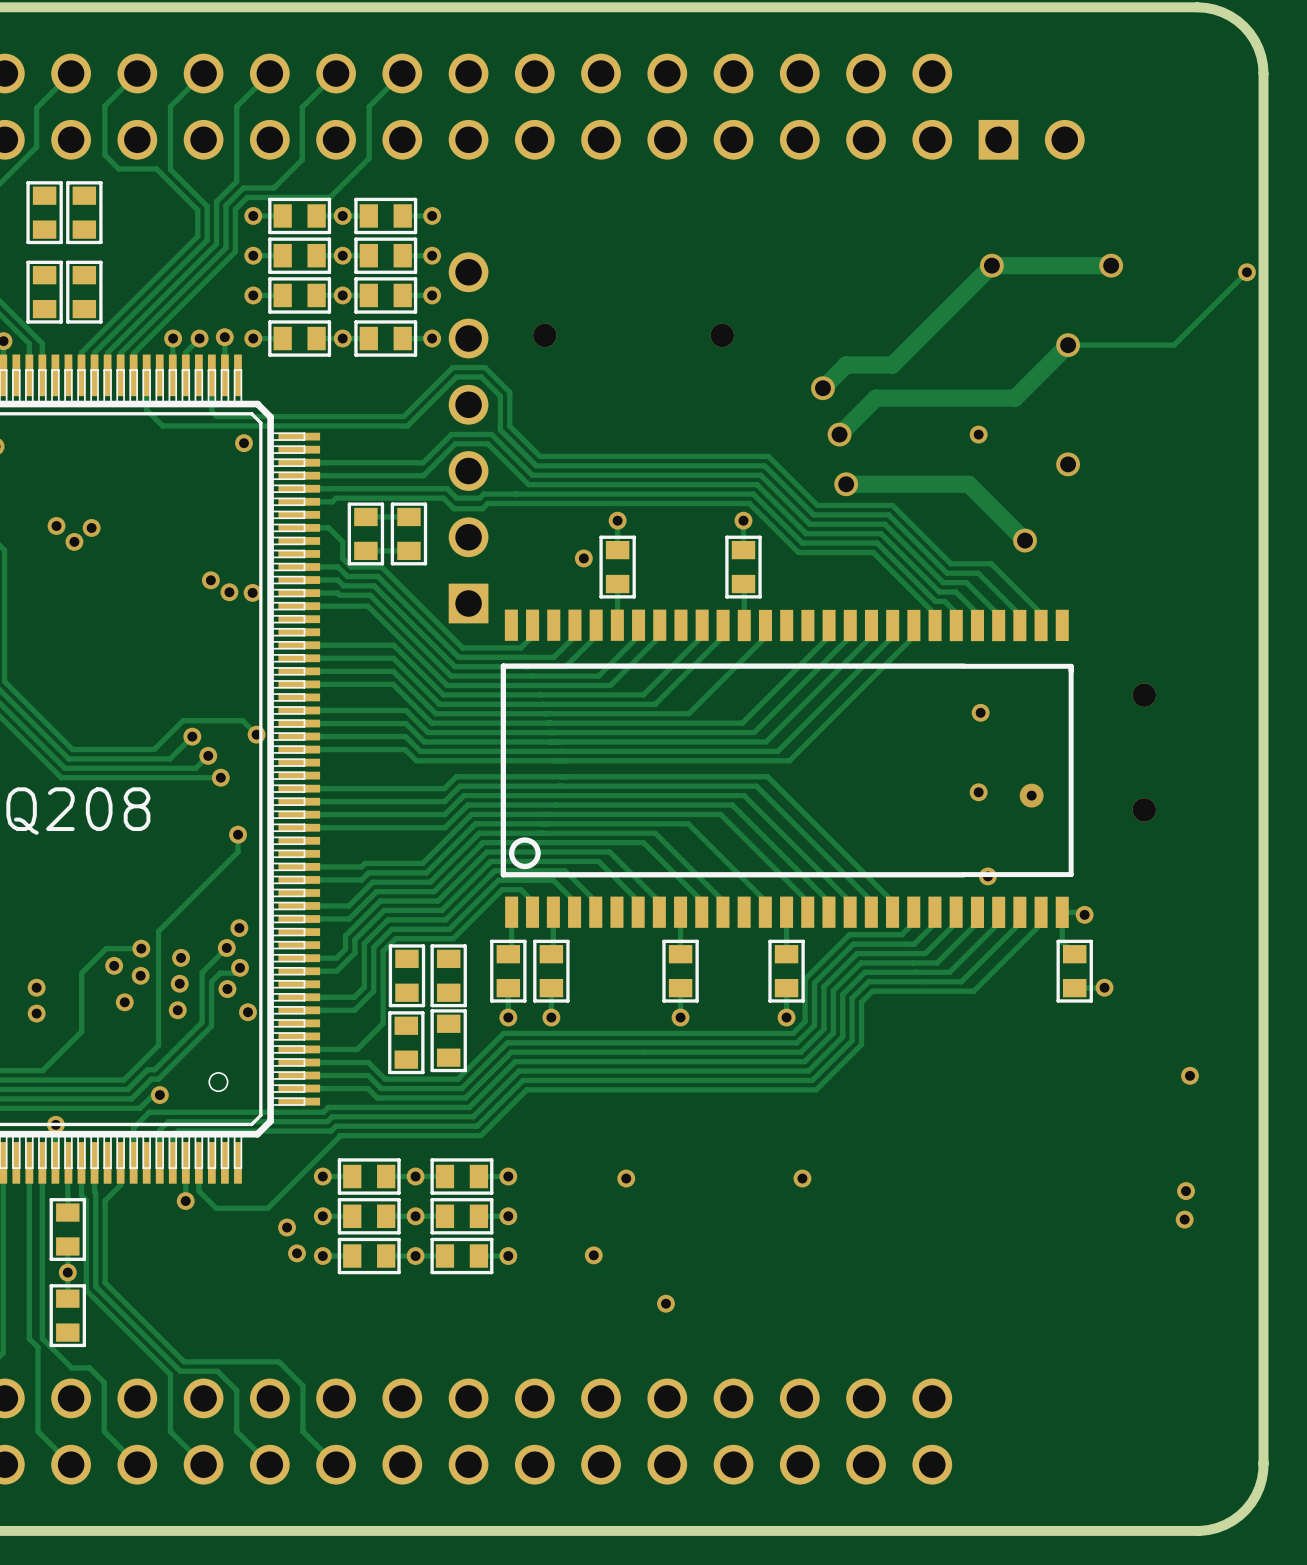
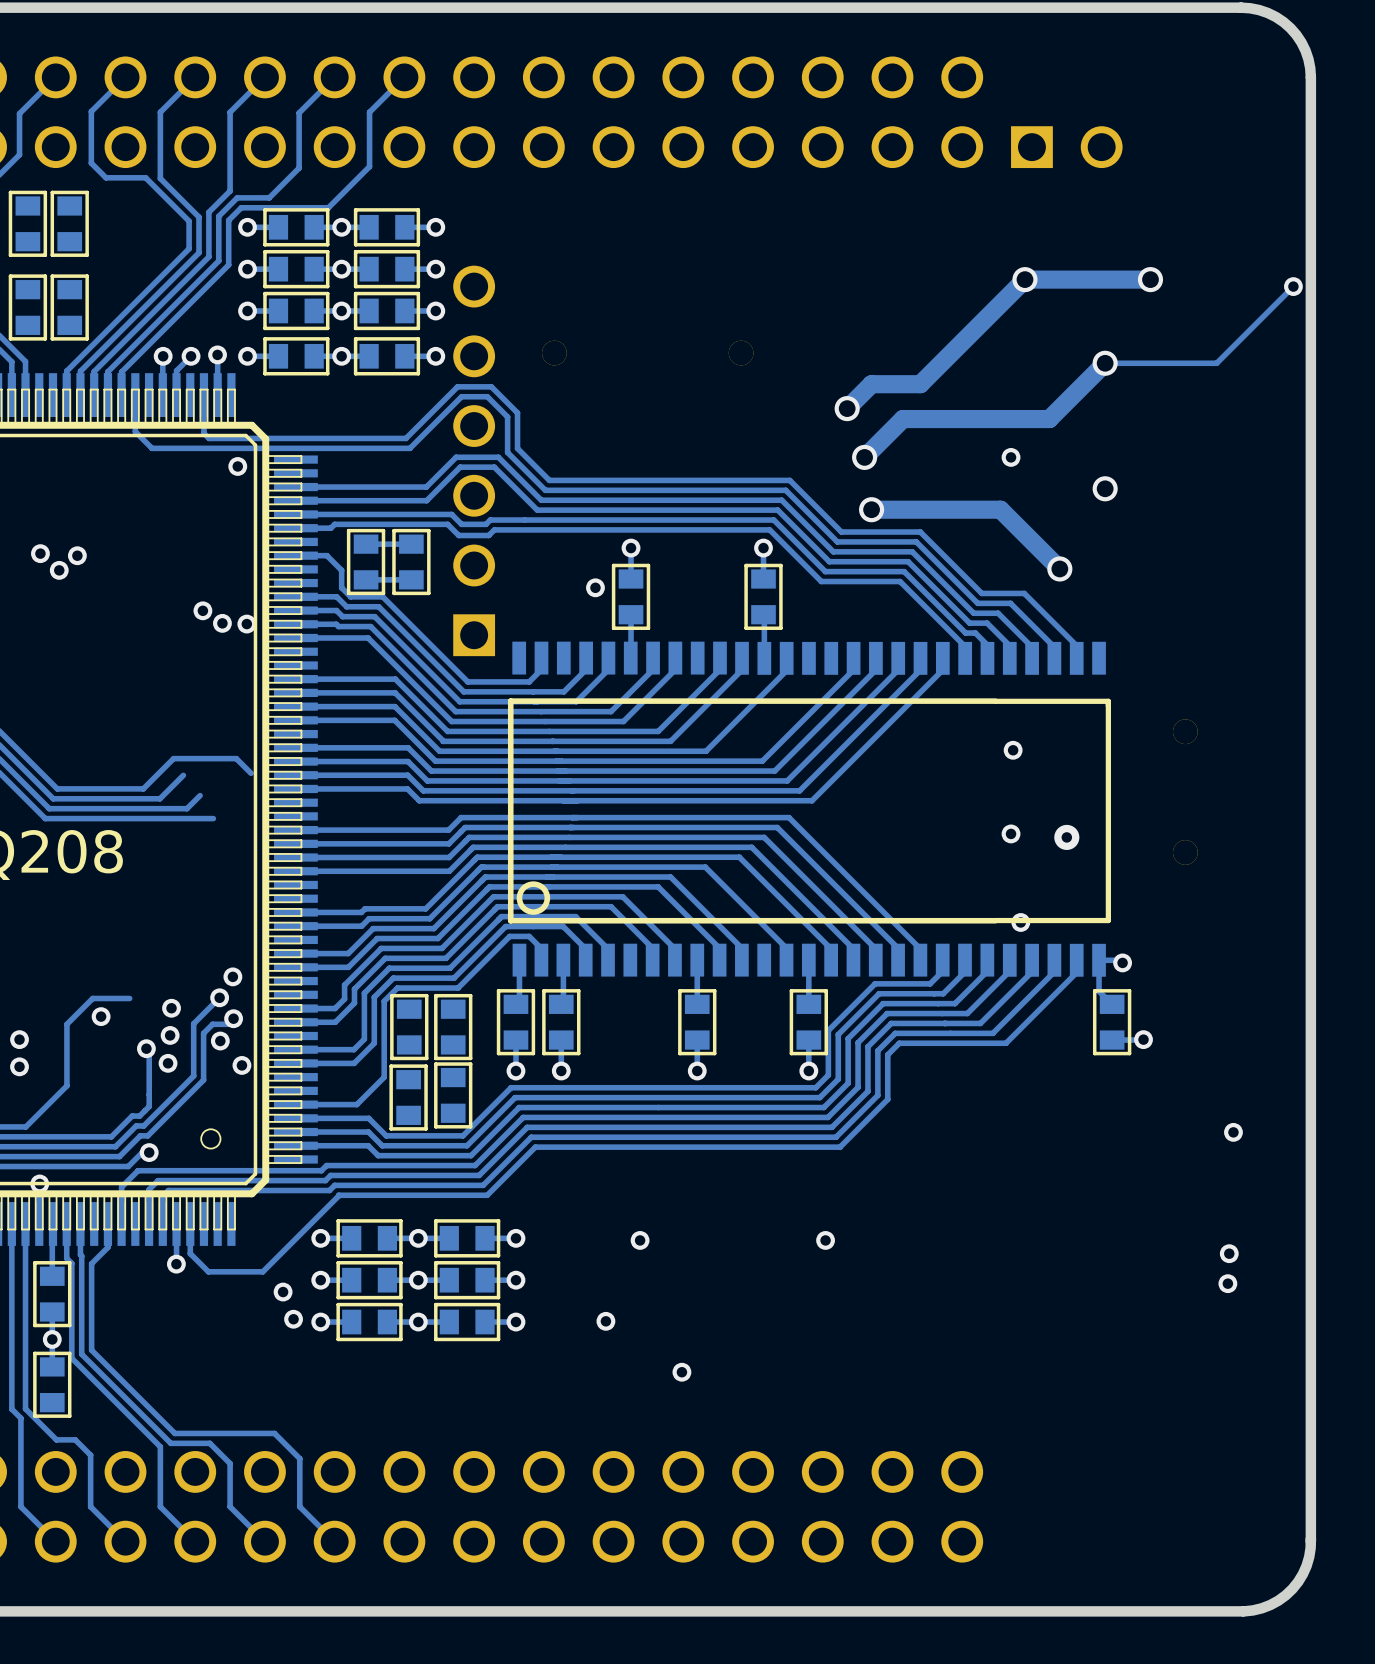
via: (256, 734) -> none
via: (192, 736) -> none
via: (208, 755) -> none
via: (220, 777) -> none
track: (238, 834) (238, 851) (158, 931) (158, 1045) (143, 1060) -> (146, 1048) (149, 1051) (149, 1106) (139, 1116) (132, 1116)
via: (238, 834) -> none
via: (141, 948) -> none
via: (140, 975) -> none
via: none -> (146, 1048)
via: (124, 1002) -> none

